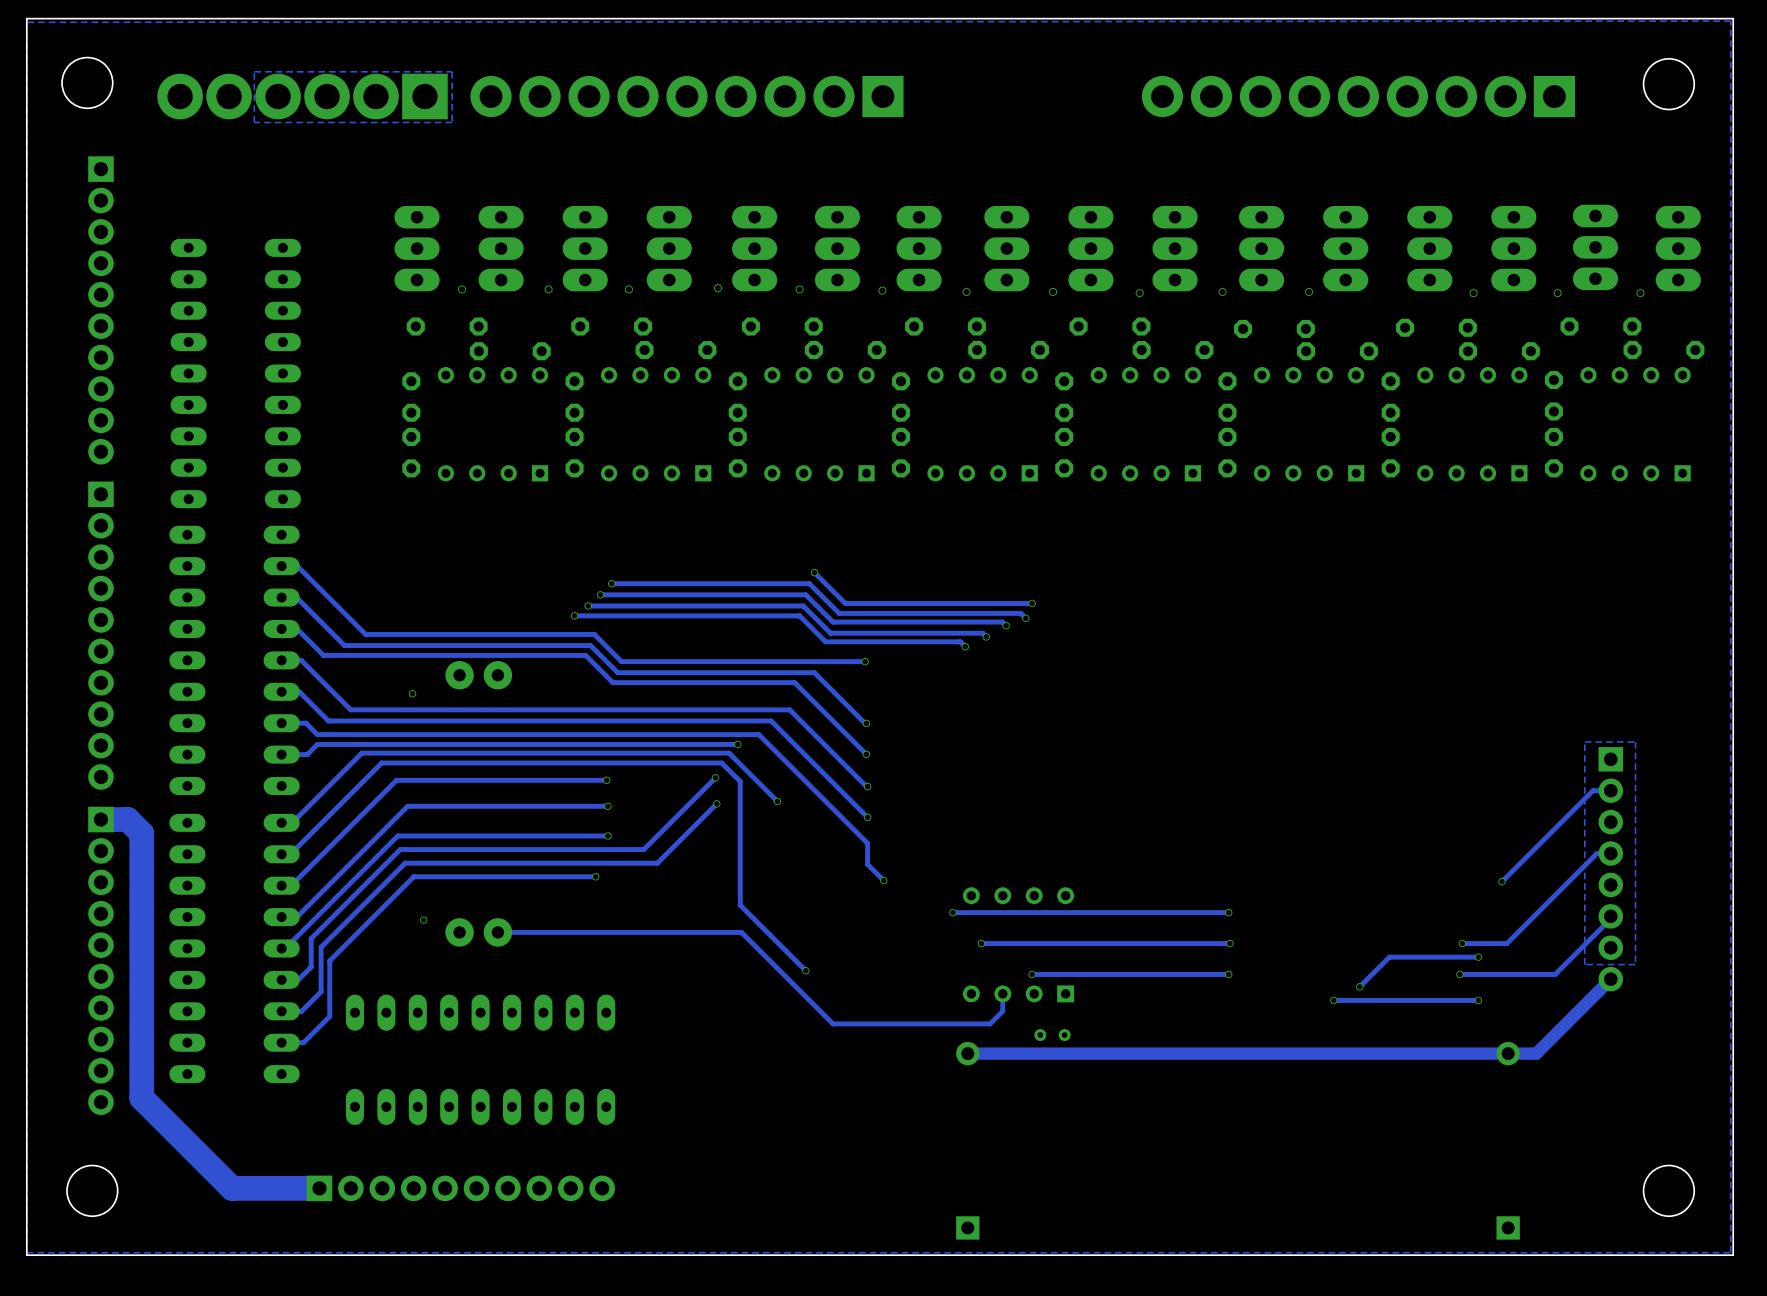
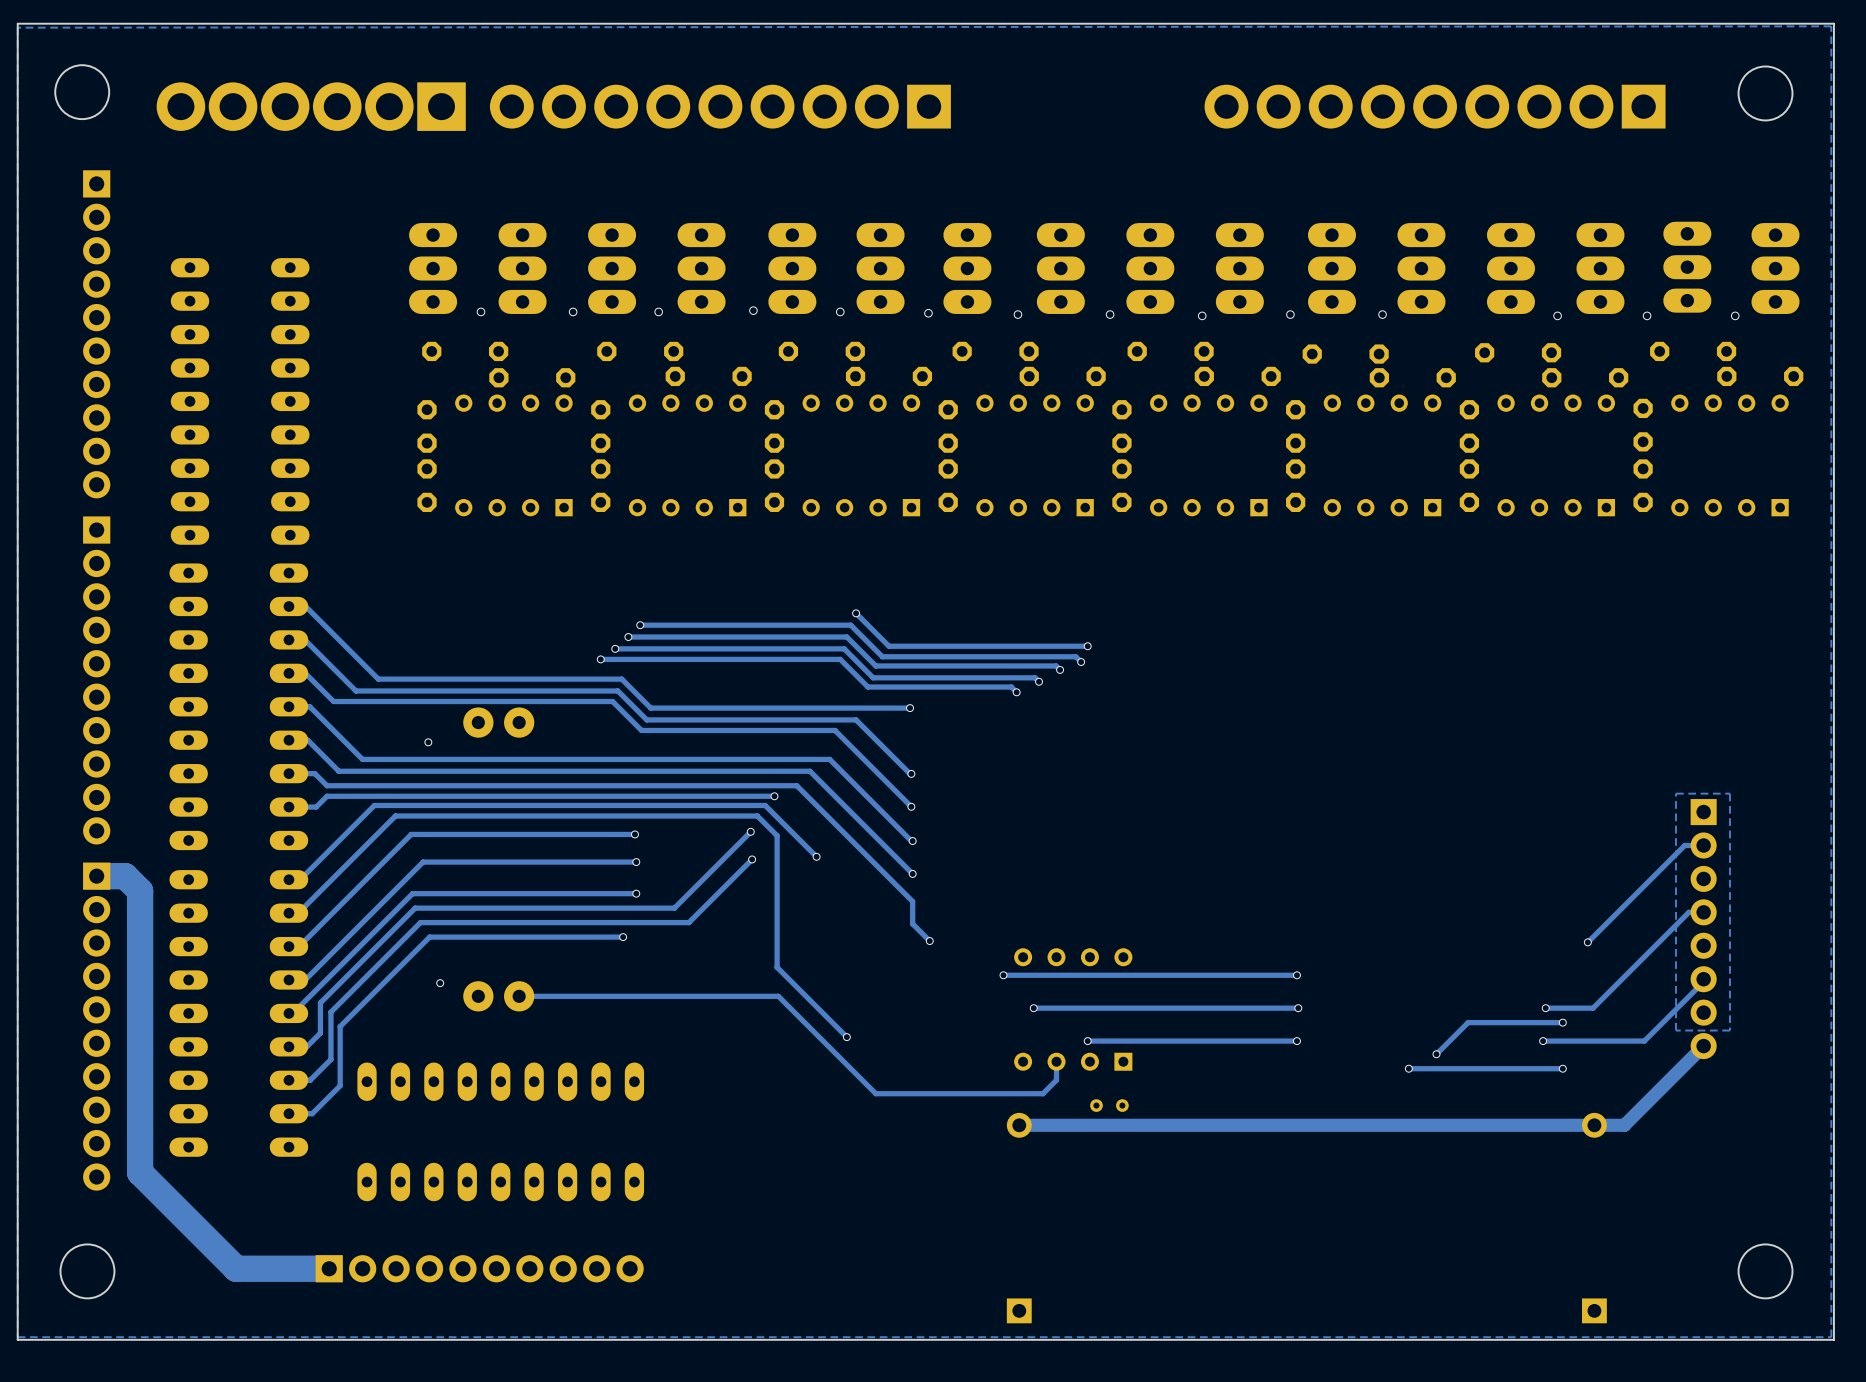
zone outline: (452, 71) (254, 71) (254, 122) (452, 122) (452, 71) -> none

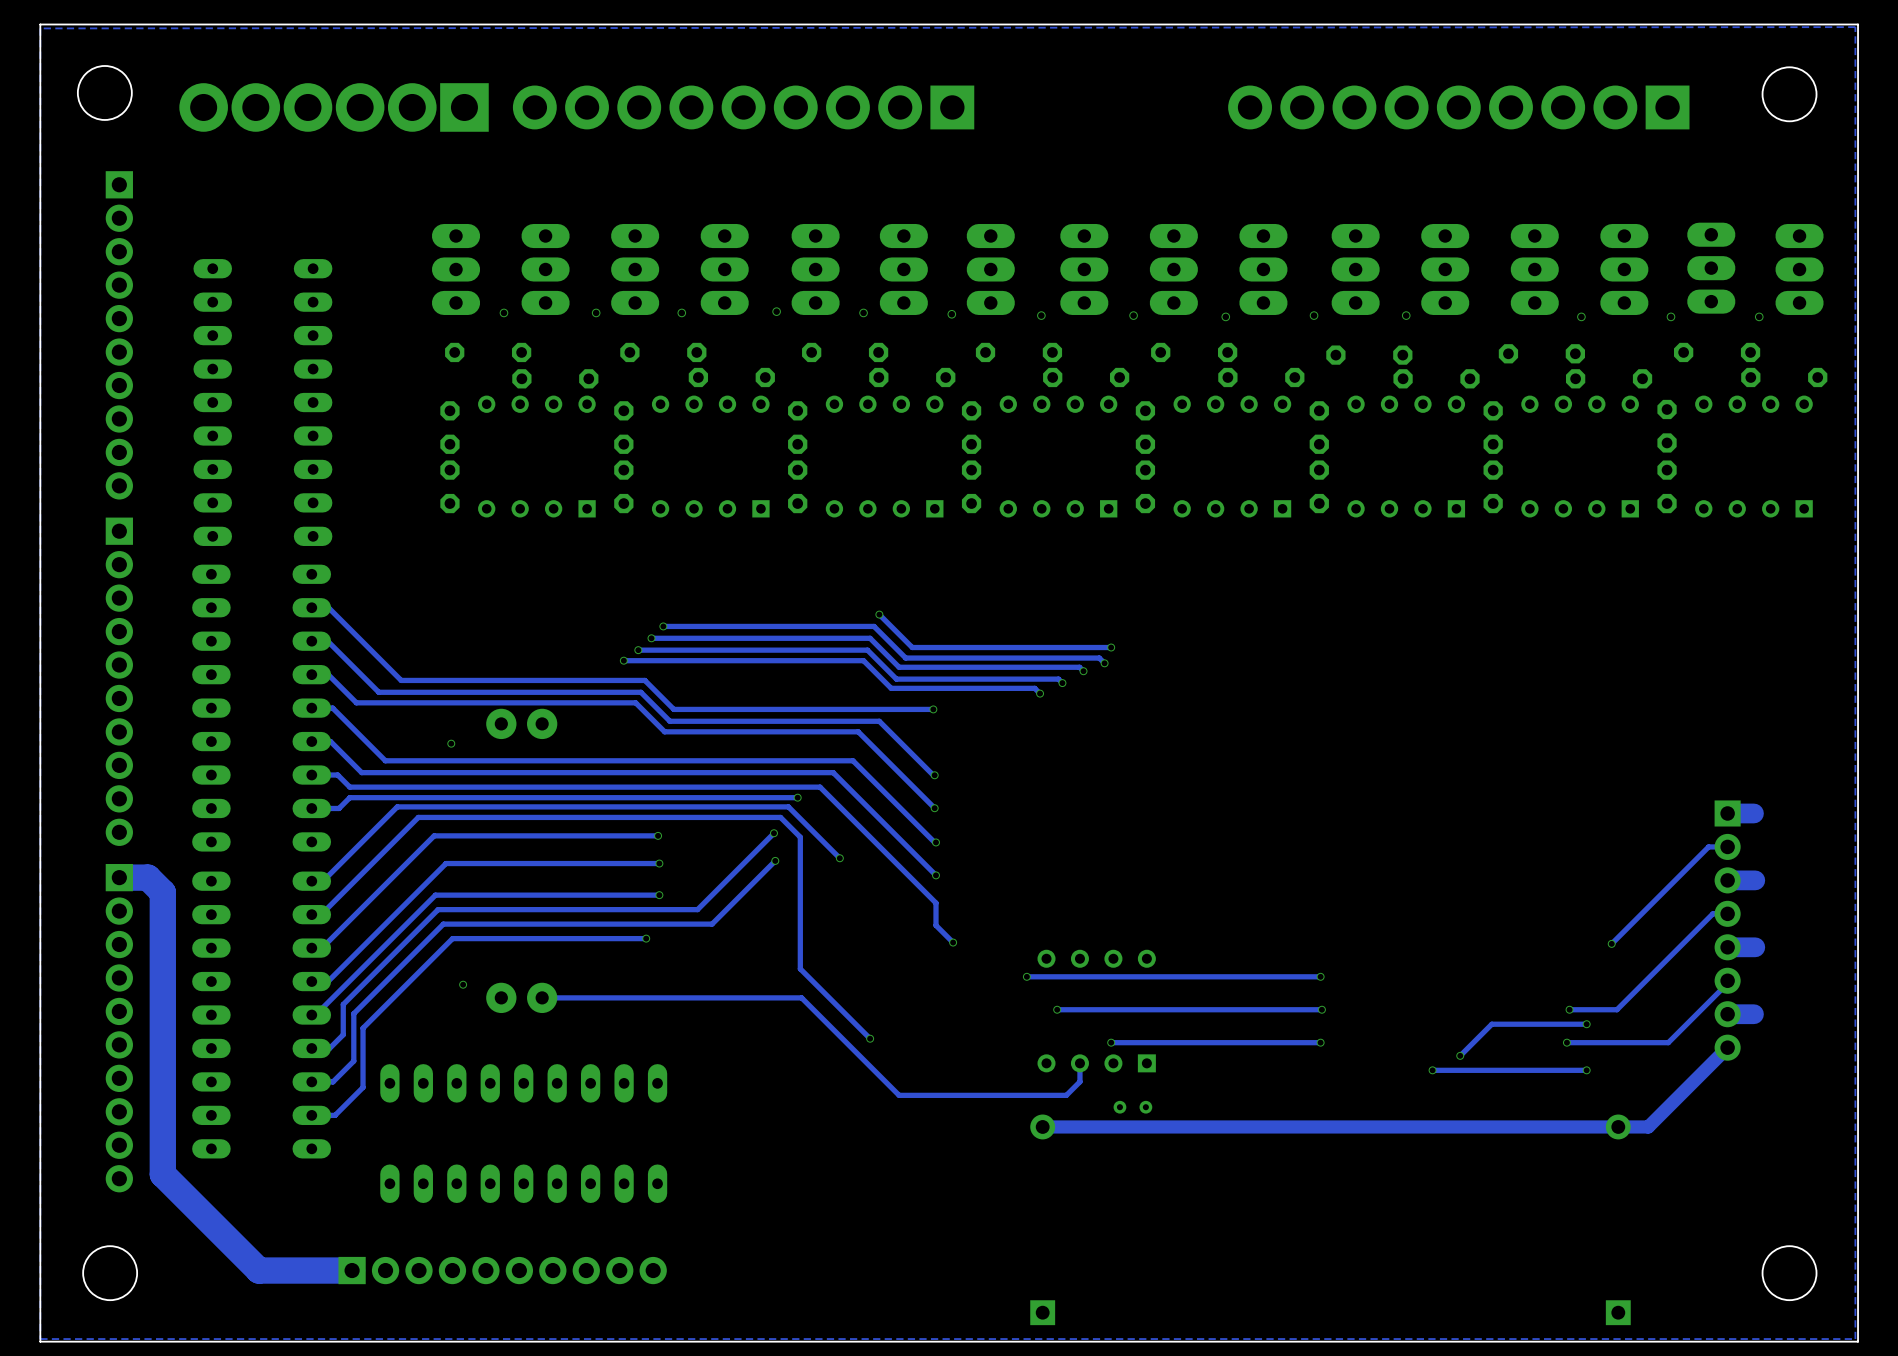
zone outline: (1729, 793) (1676, 793) (1676, 1030) (1729, 1030) (1729, 793) -> none
track: none -> (1753, 813) (1732, 813)
track: none -> (1755, 880) (1727, 880)
track: none -> (1755, 947) (1727, 947)
track: none -> (1753, 1014) (1727, 1014)

